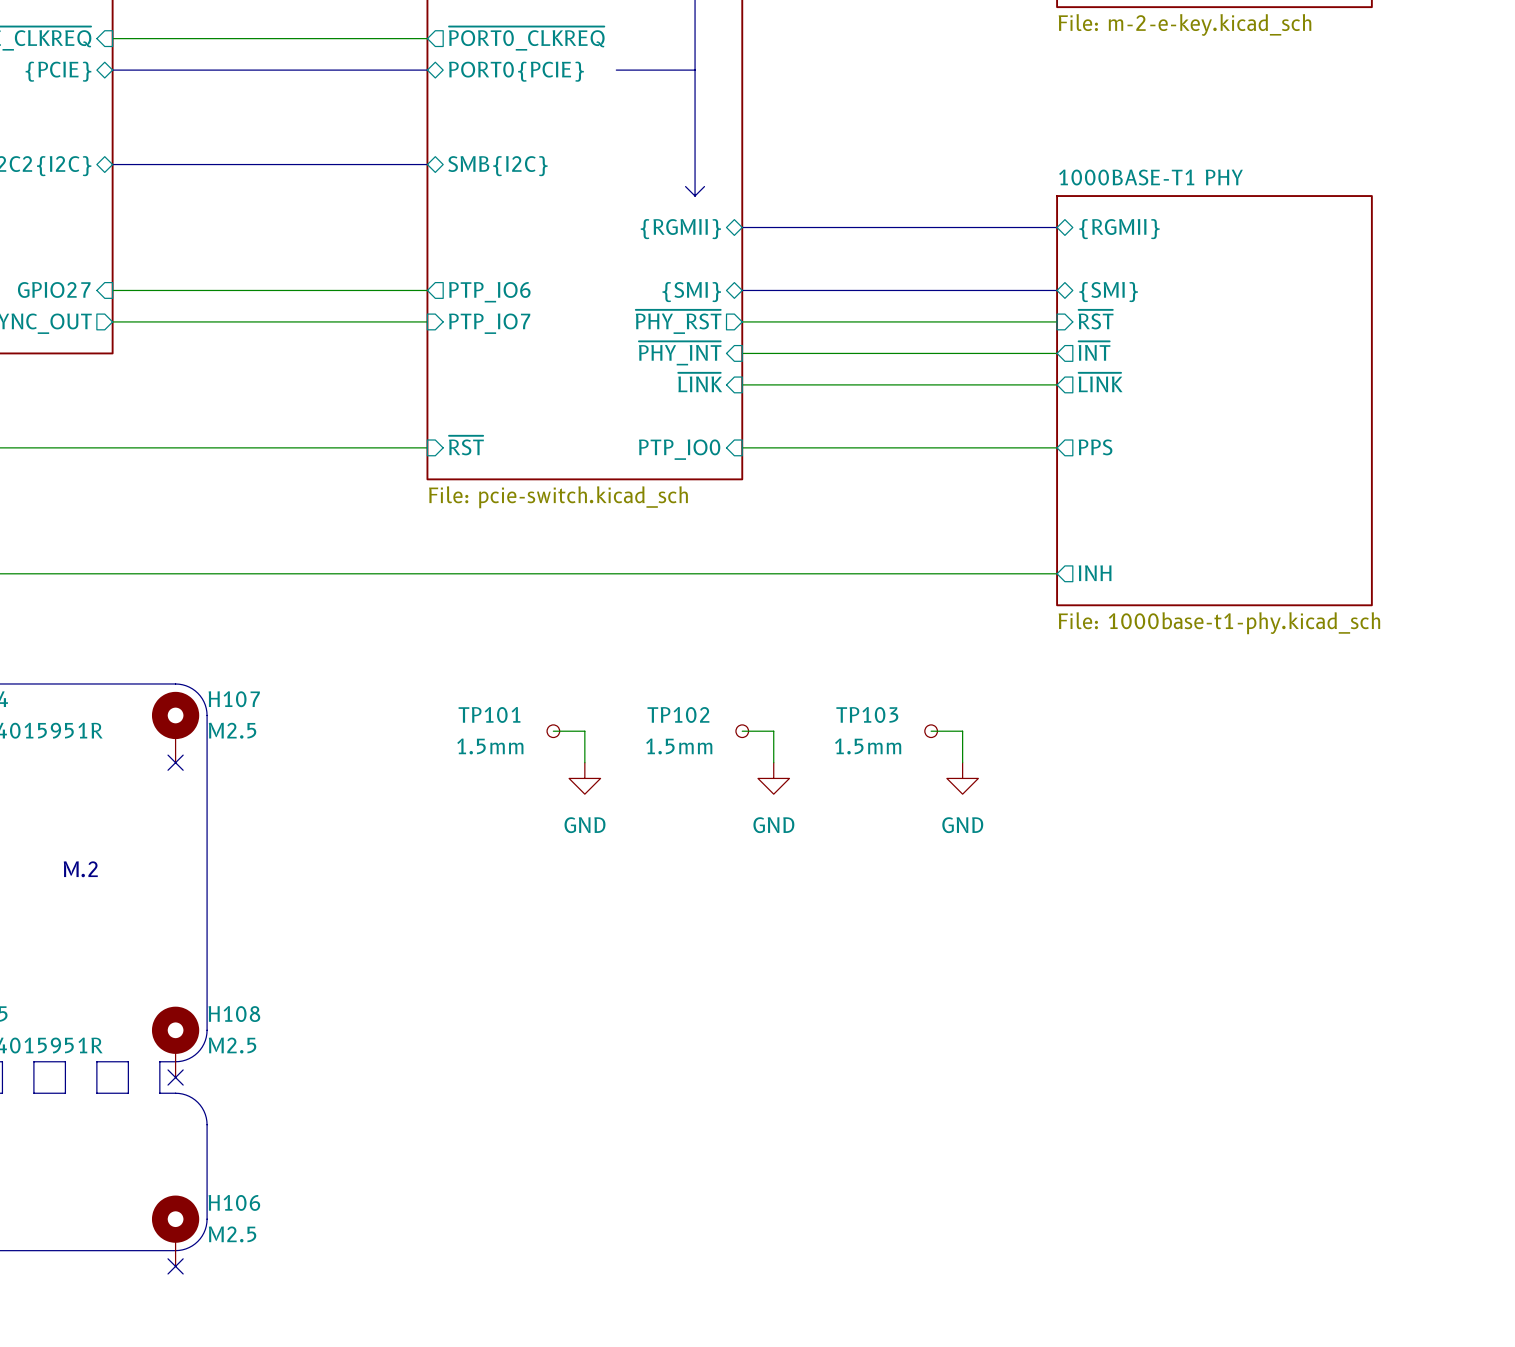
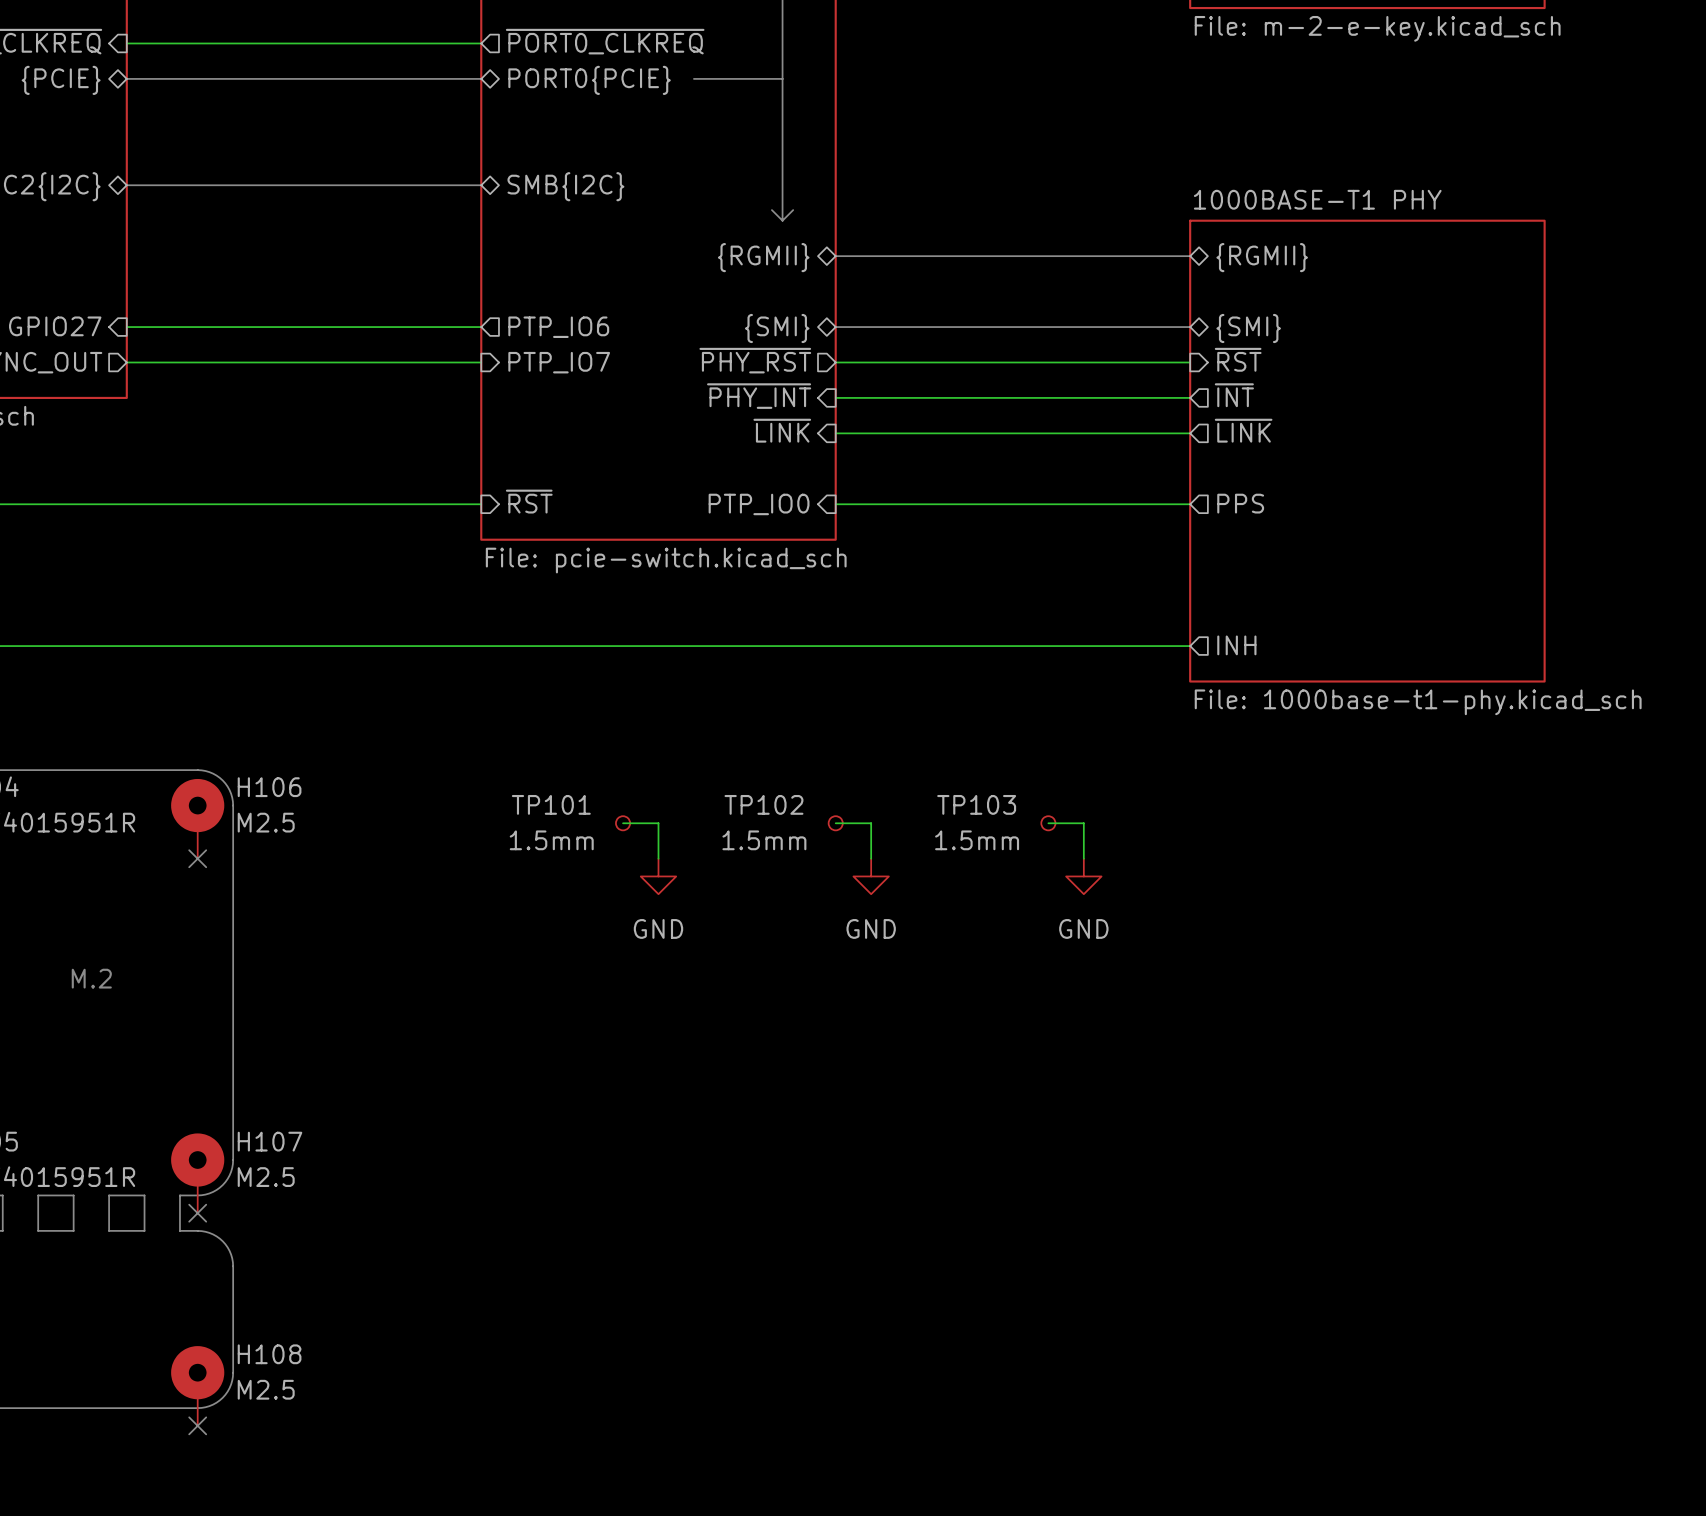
H107 name: H107 (234, 699) -> H106 (269, 787)
H108 name: H108 (234, 1014) -> H107 (269, 1141)
H106 name: H106 (234, 1202) -> H108 (269, 1354)

